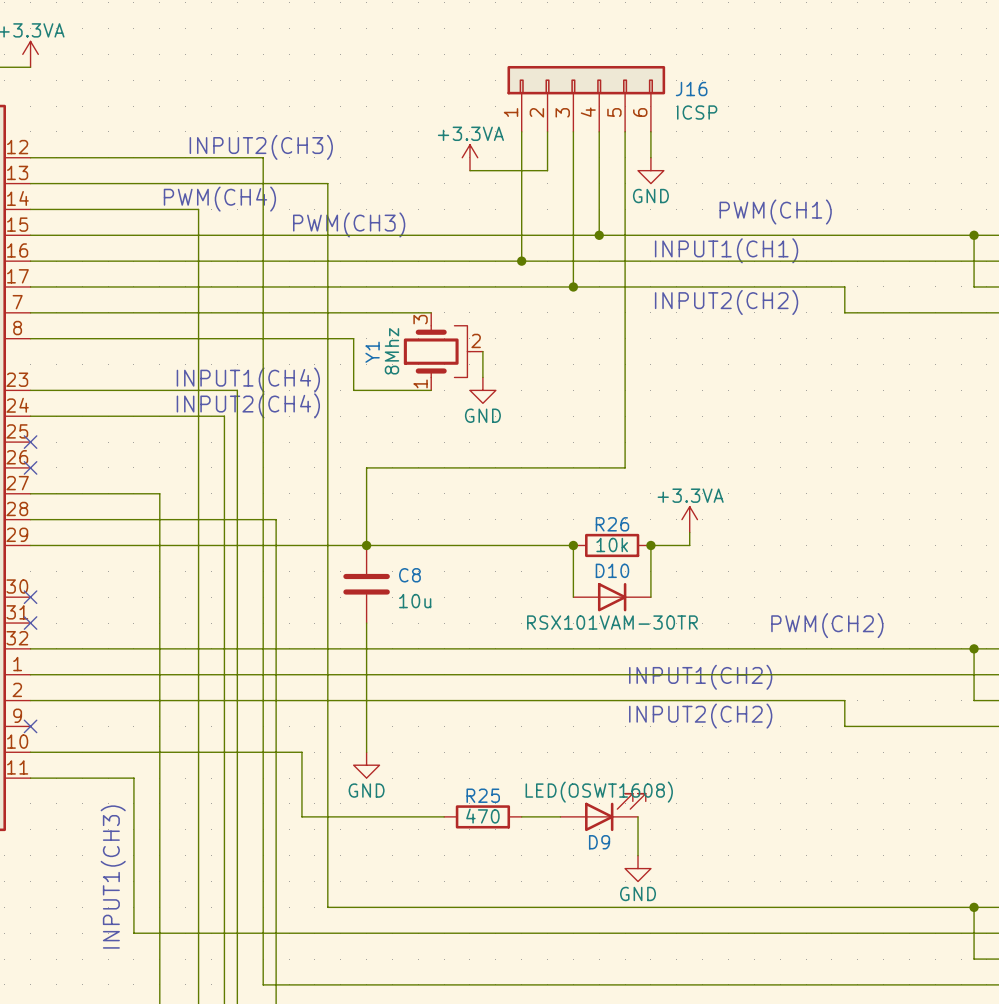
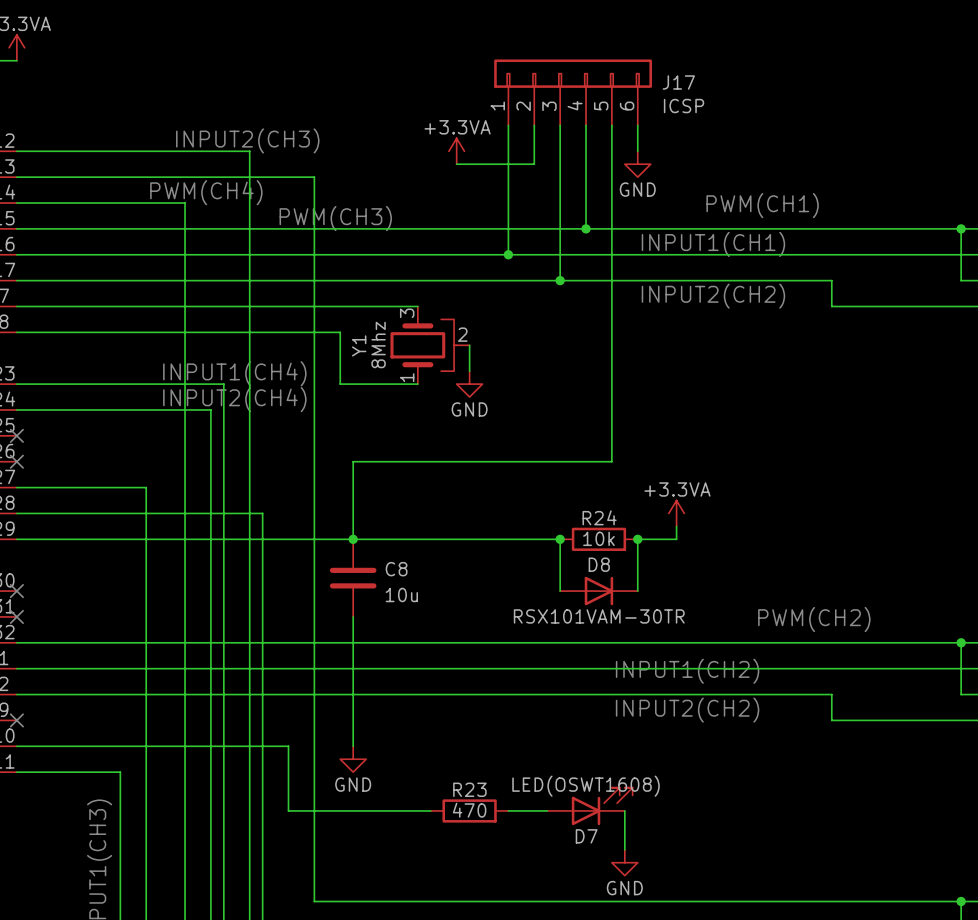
J16 name: J16 (691, 89) -> J17 (678, 82)
R26 name: R26 (612, 524) -> R24 (599, 517)
D10 name: D10 (612, 570) -> D8 (599, 564)
R25 name: R25 (483, 795) -> R23 (469, 789)
D9 name: D9 (599, 842) -> D7 (586, 836)

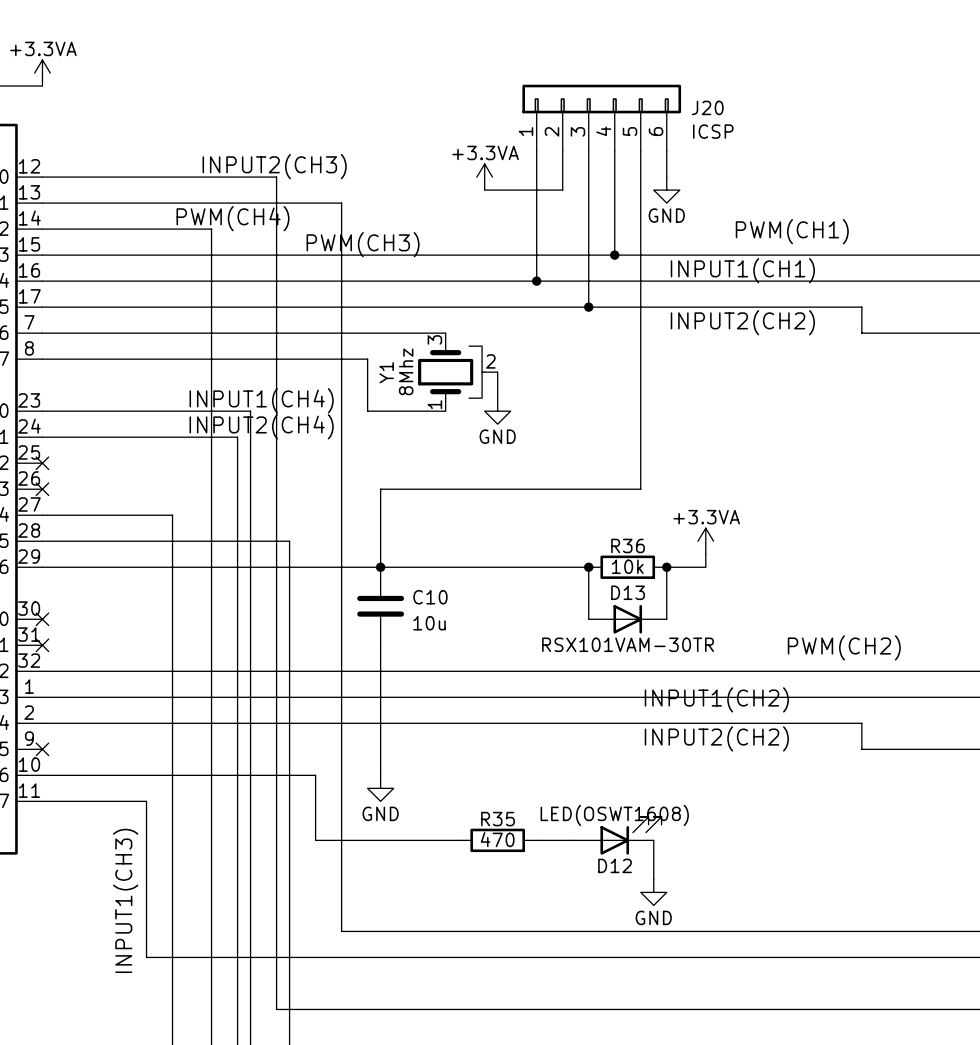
J17 name: J17 (678, 82) -> J20 (707, 107)
R24 name: R24 (599, 517) -> R36 (628, 545)
D8 name: D8 (599, 564) -> D13 (628, 592)
C8 name: C8 (396, 569) -> C10 (430, 597)
R23 name: R23 (469, 789) -> R35 (497, 819)
D7 name: D7 (586, 836) -> D12 (615, 865)

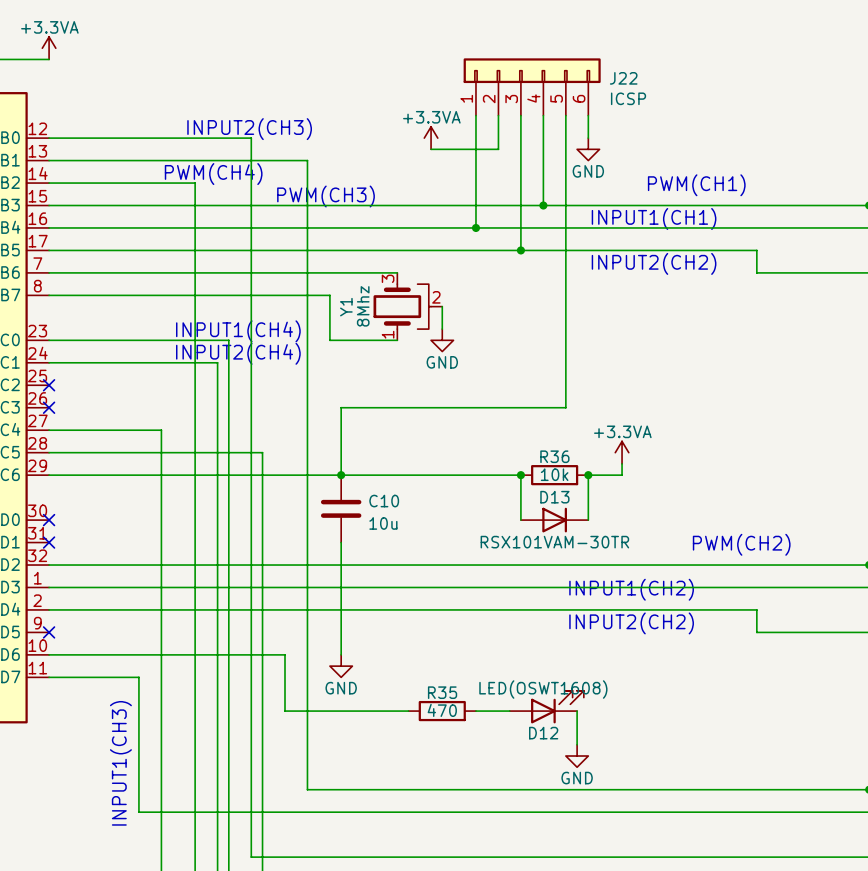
J20 name: J20 (707, 107) -> J22 (623, 78)

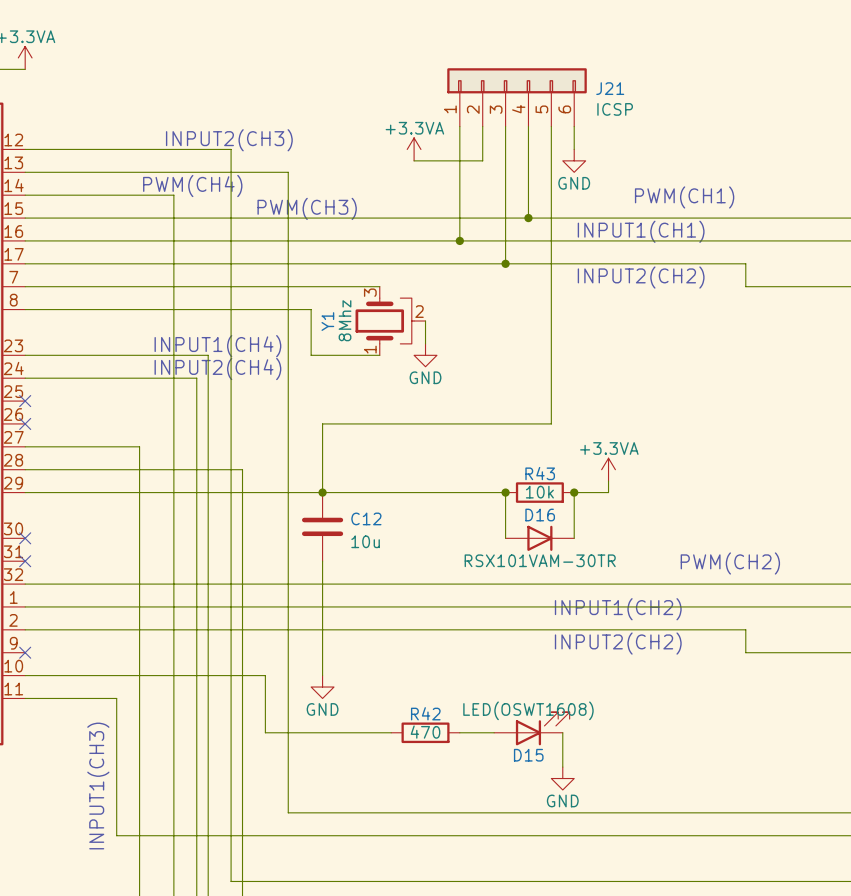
J22 name: J22 (623, 78) -> J21 (610, 88)
R36 name: R36 (554, 456) -> R43 (540, 473)
D13 name: D13 (554, 497) -> D16 (540, 515)
C10 name: C10 (384, 501) -> C12 (366, 518)
R35 name: R35 (442, 692) -> R42 (425, 713)
D12 name: D12 (543, 733) -> D15 (528, 755)

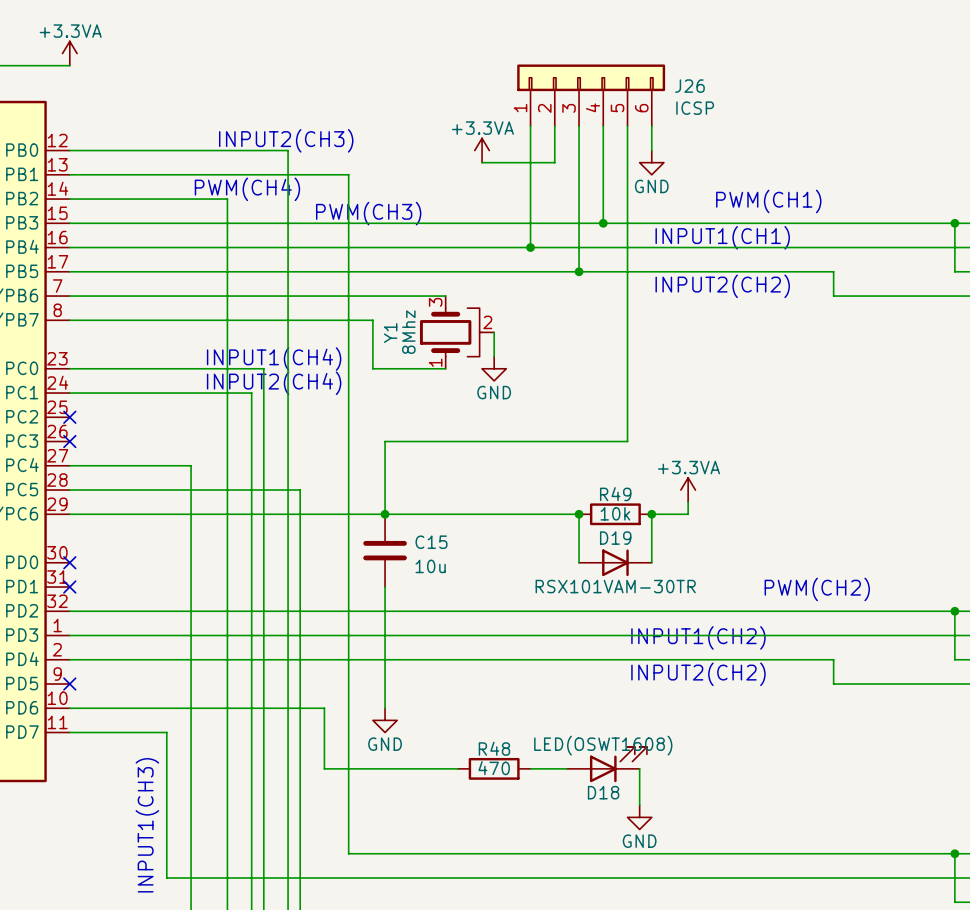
J21 name: J21 (610, 88) -> J26 (689, 86)
R43 name: R43 (540, 473) -> R49 (615, 494)
D16 name: D16 (540, 515) -> D19 (615, 538)
C12 name: C12 (366, 518) -> C15 (431, 542)
R42 name: R42 (425, 713) -> R48 (494, 748)
D15 name: D15 (528, 755) -> D18 (603, 792)

